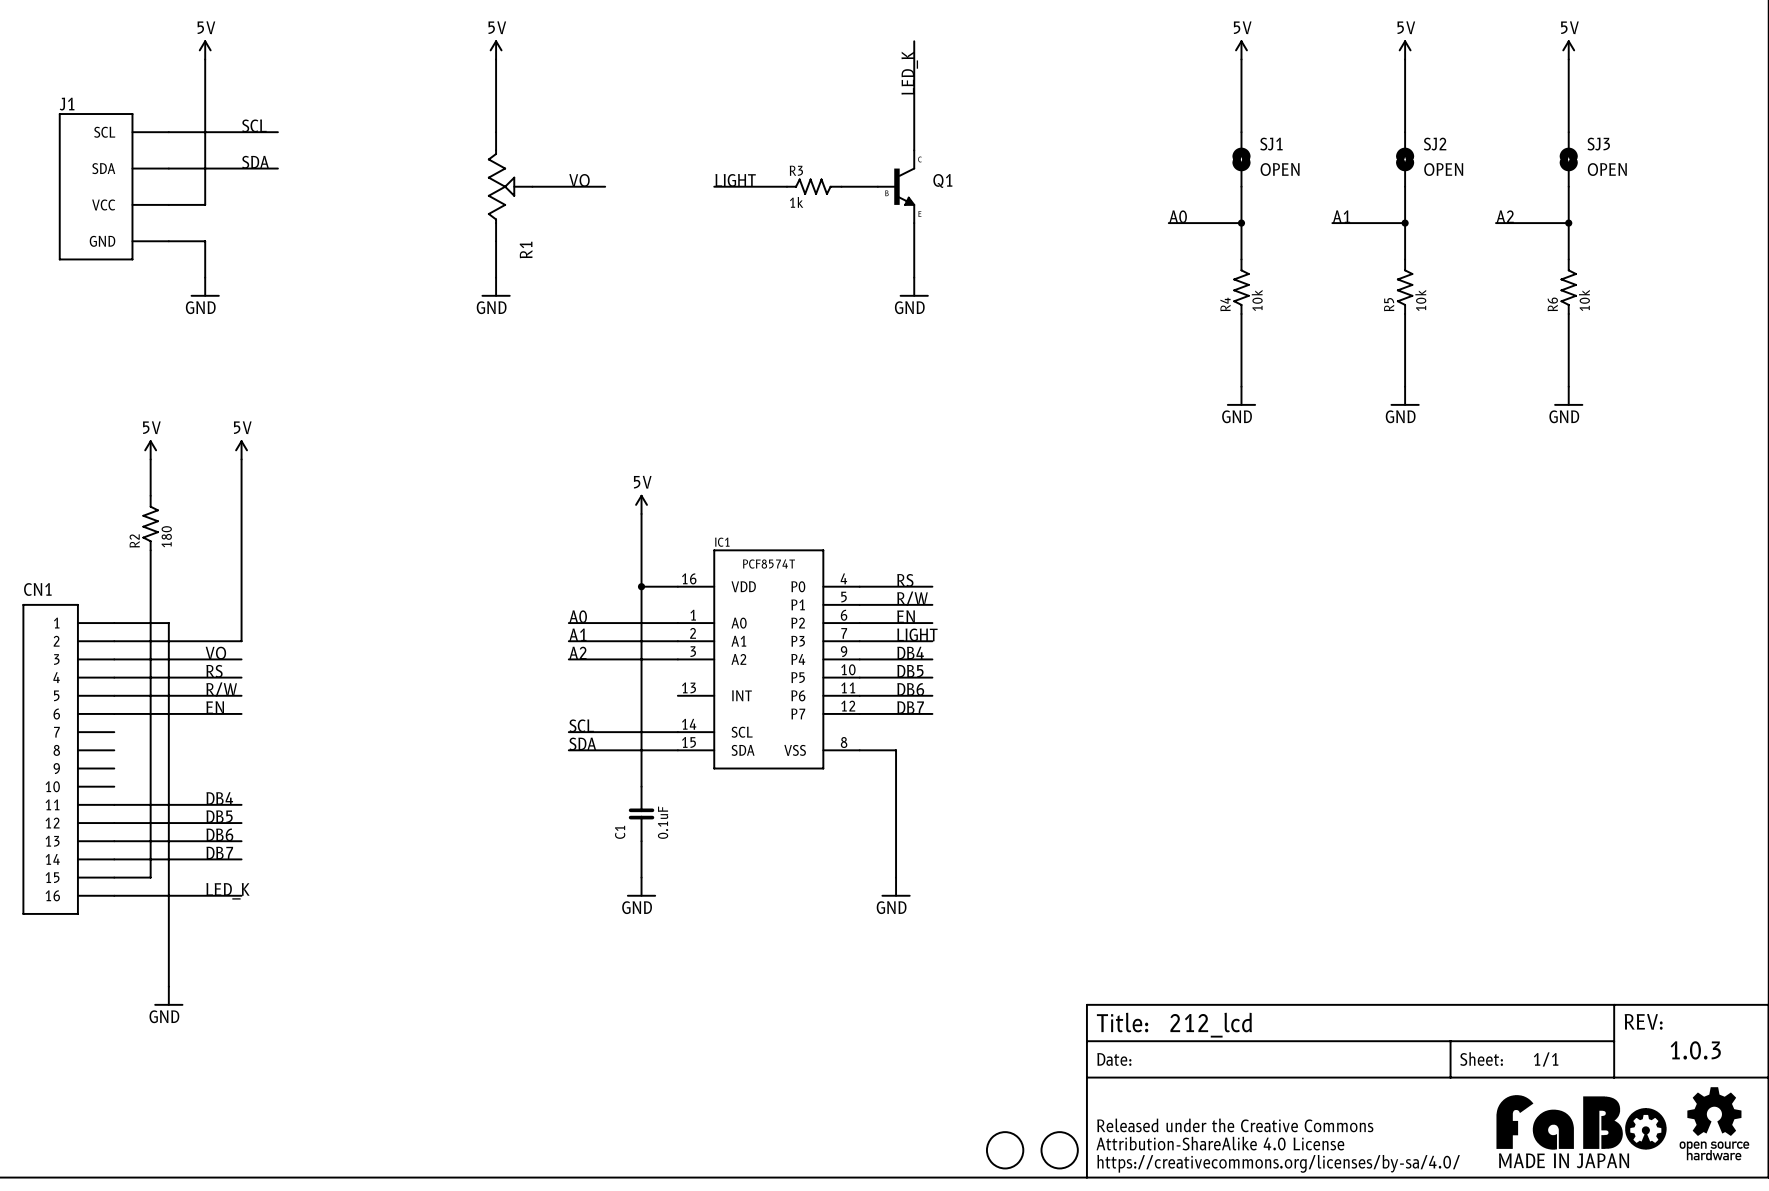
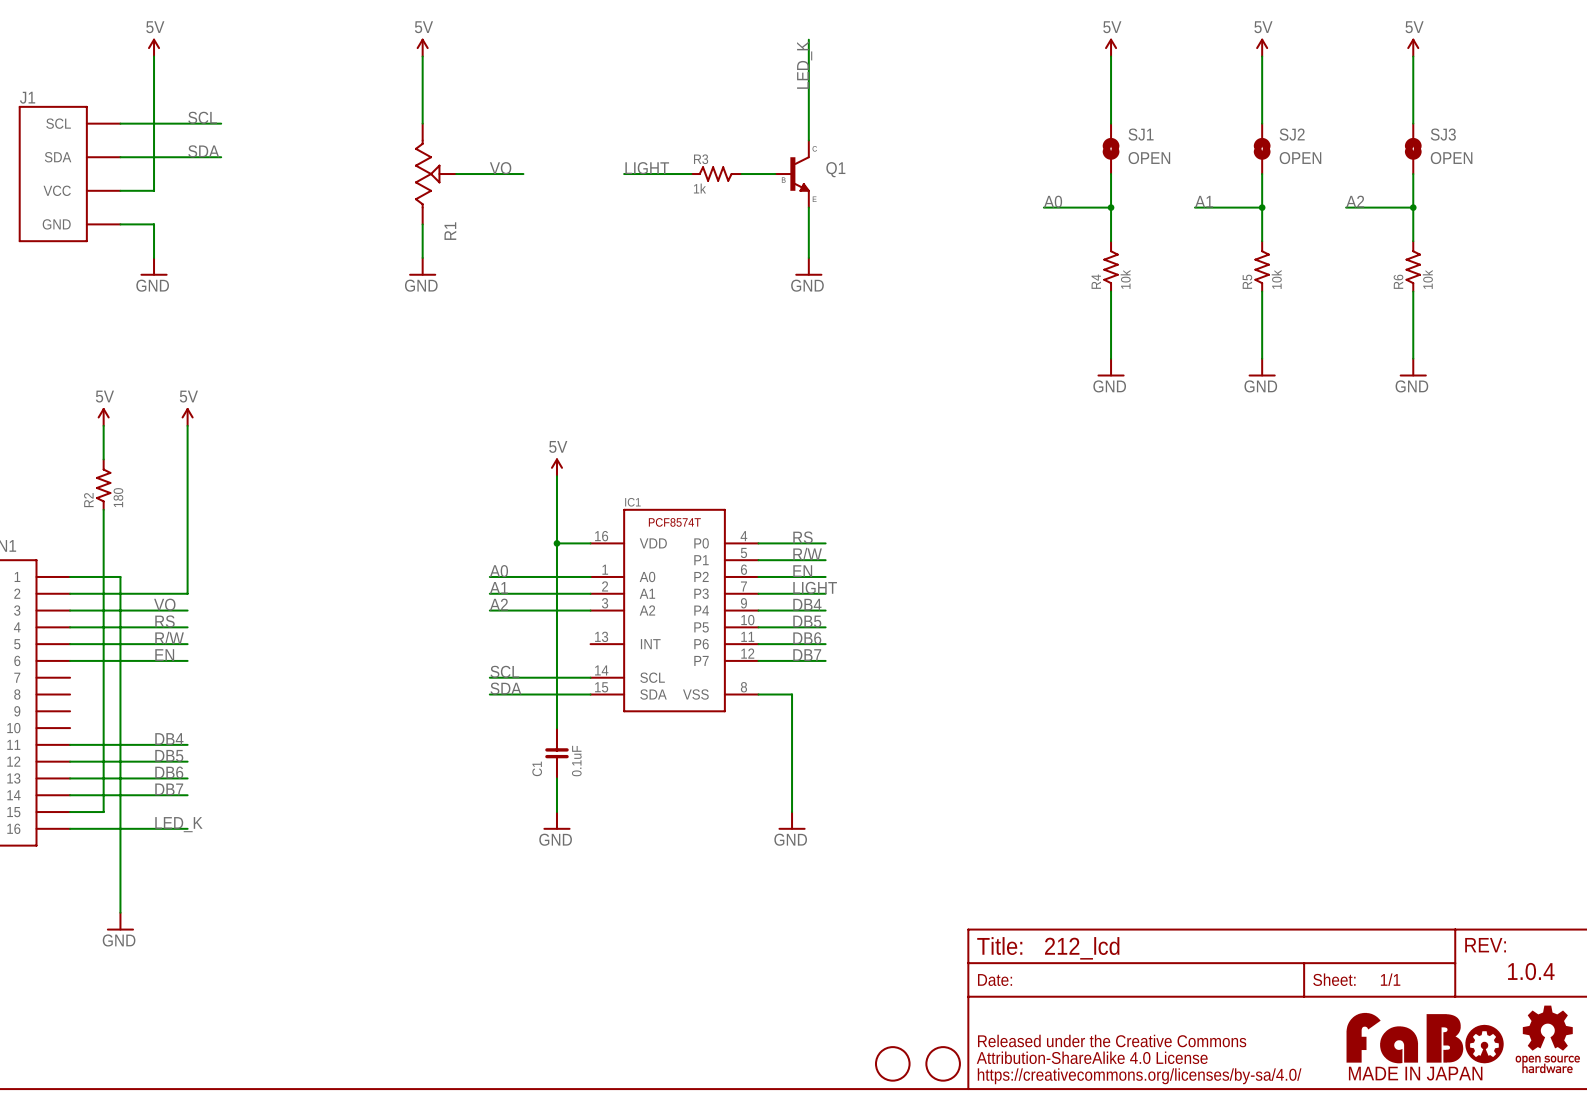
text: 1.0.3 (1695, 1050) -> 1.0.4 (1531, 971)

